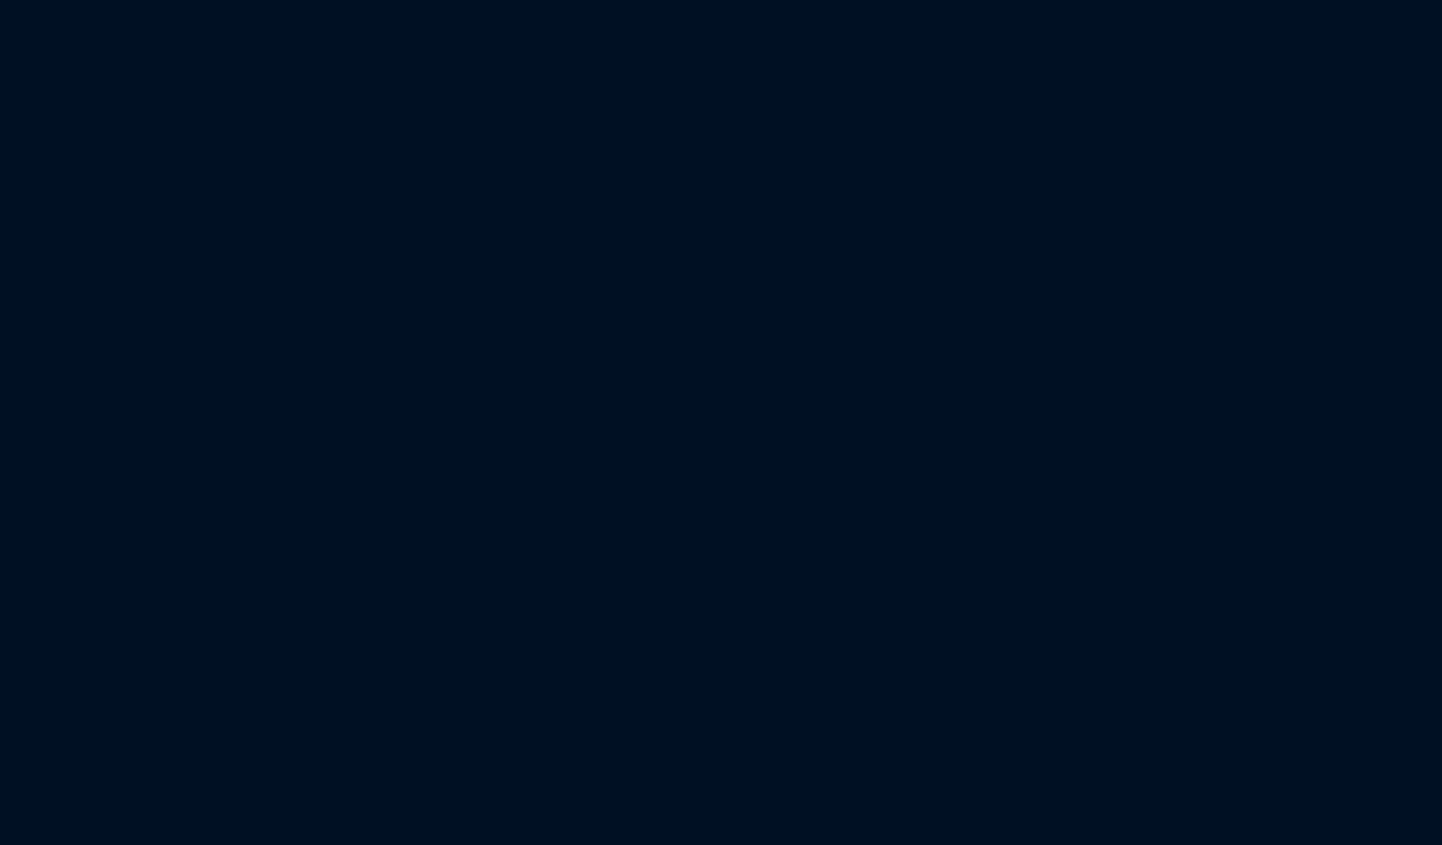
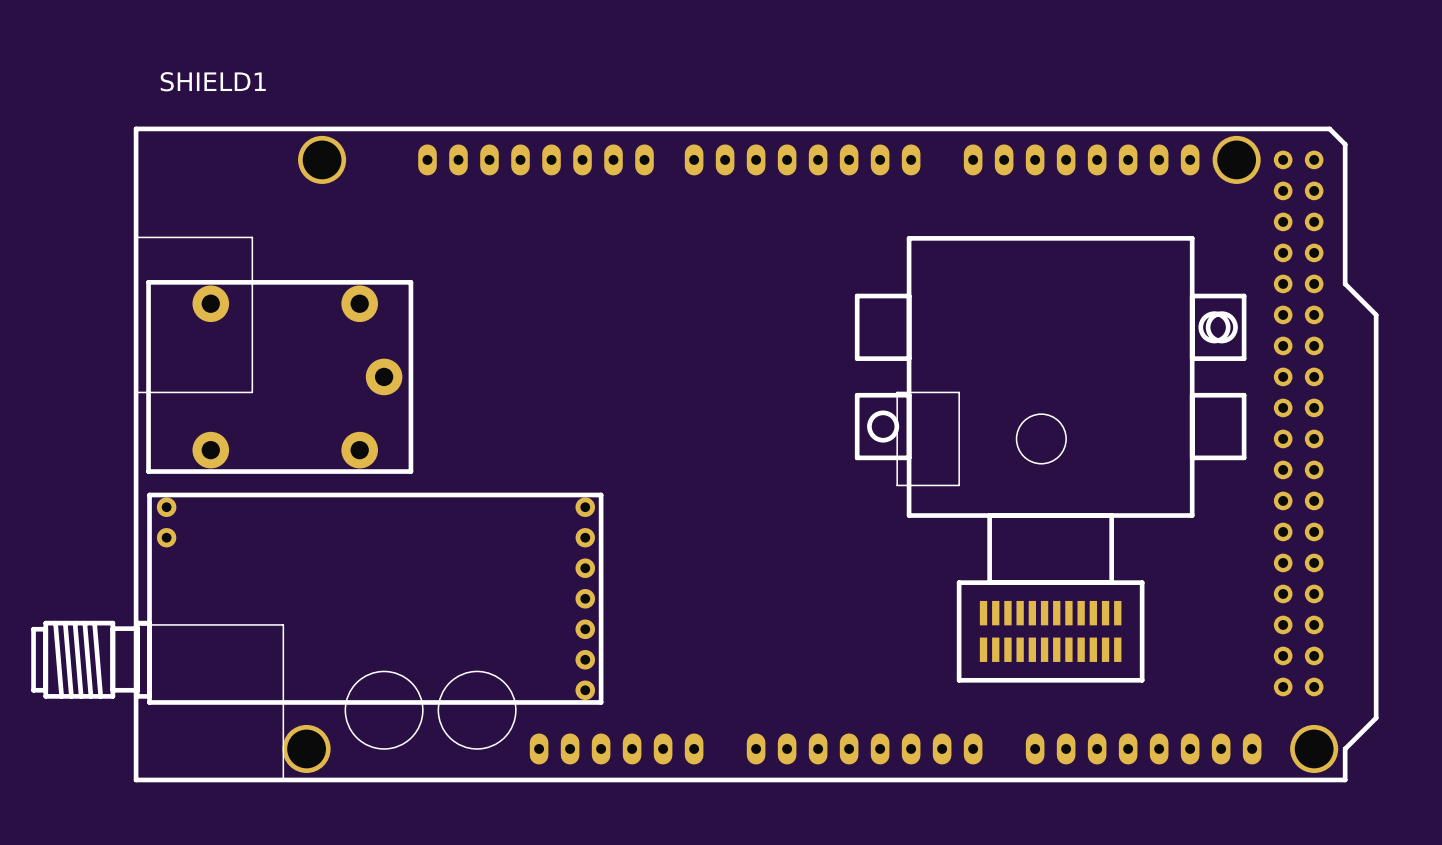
part: none -> (279, 376)
SHIELD1: none -> (756, 454)
part: none -> (1050, 459)
part: none -> (317, 598)

